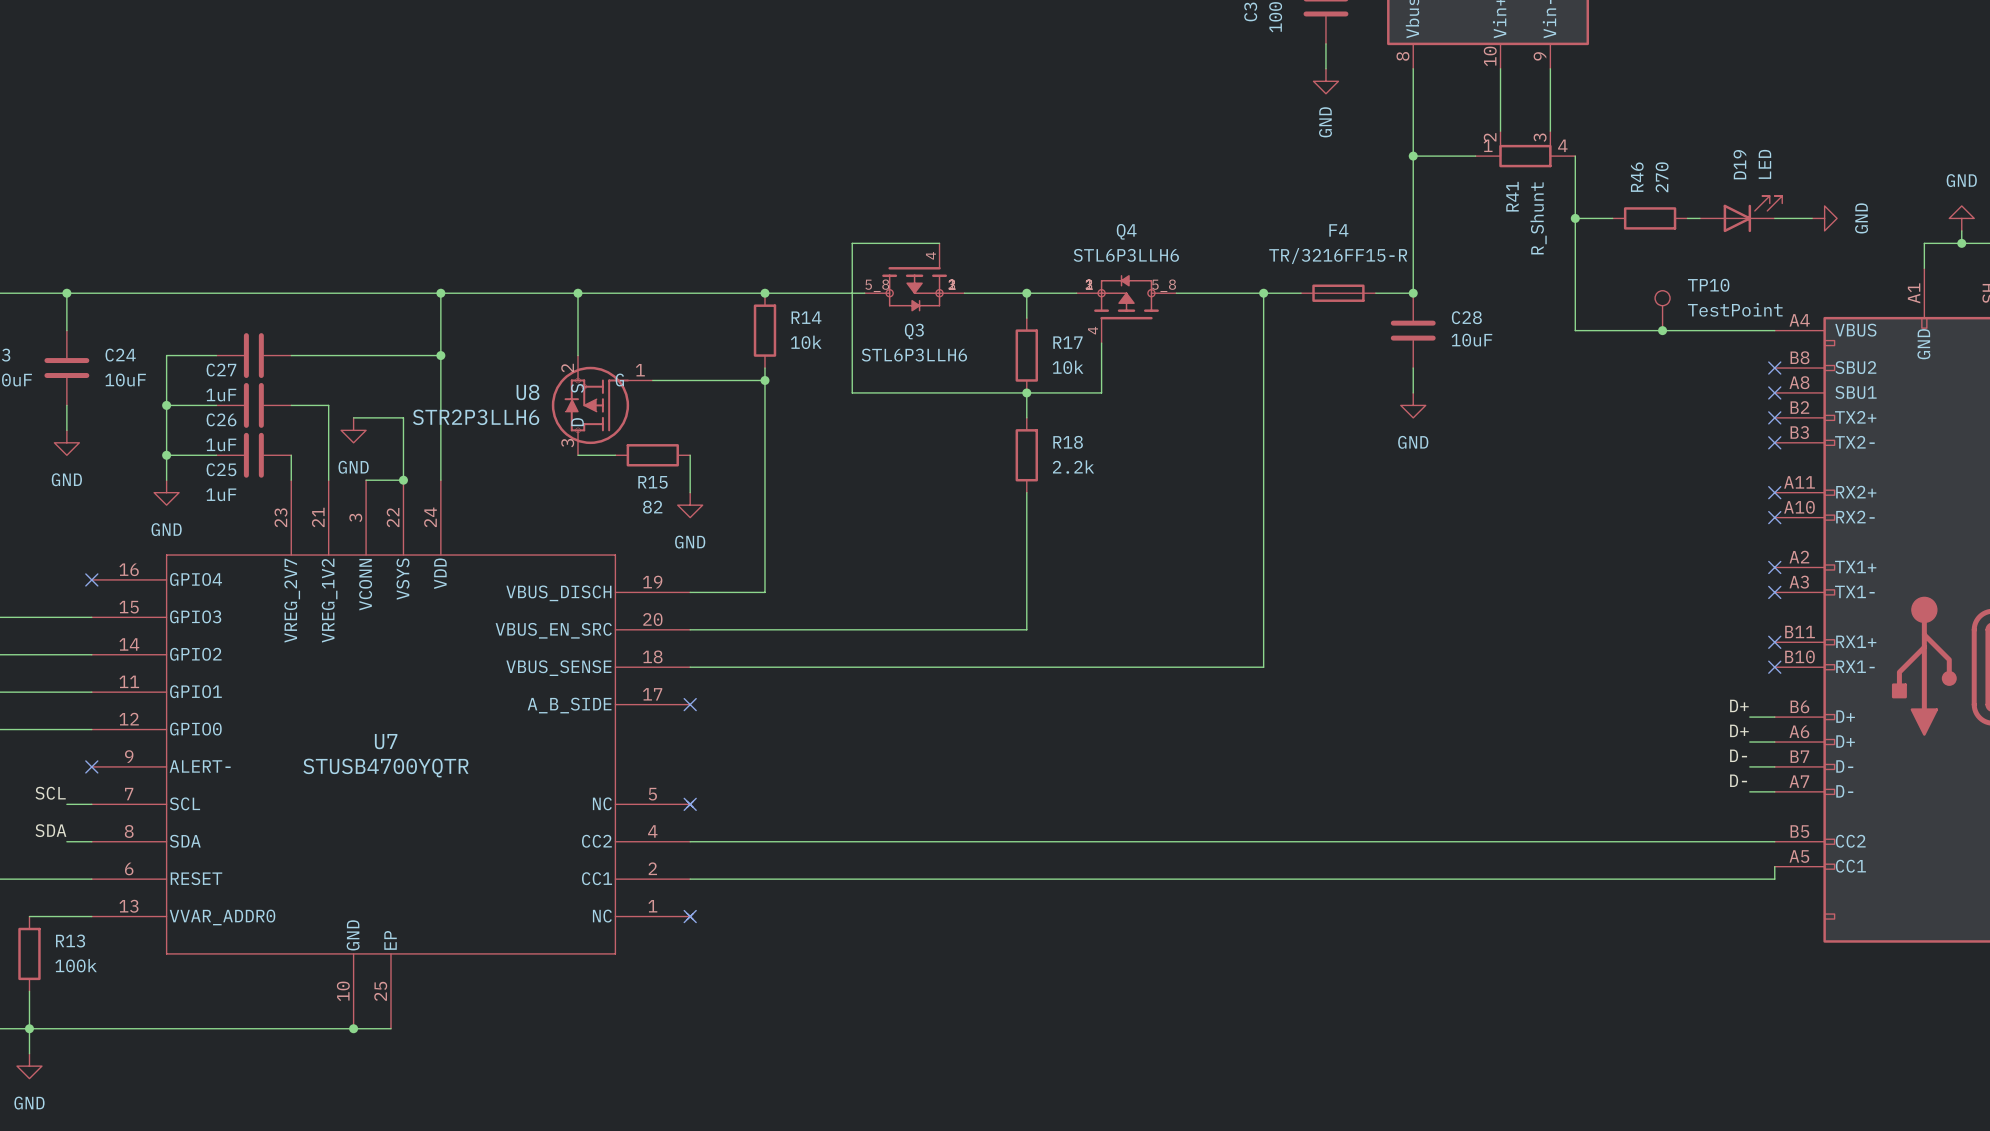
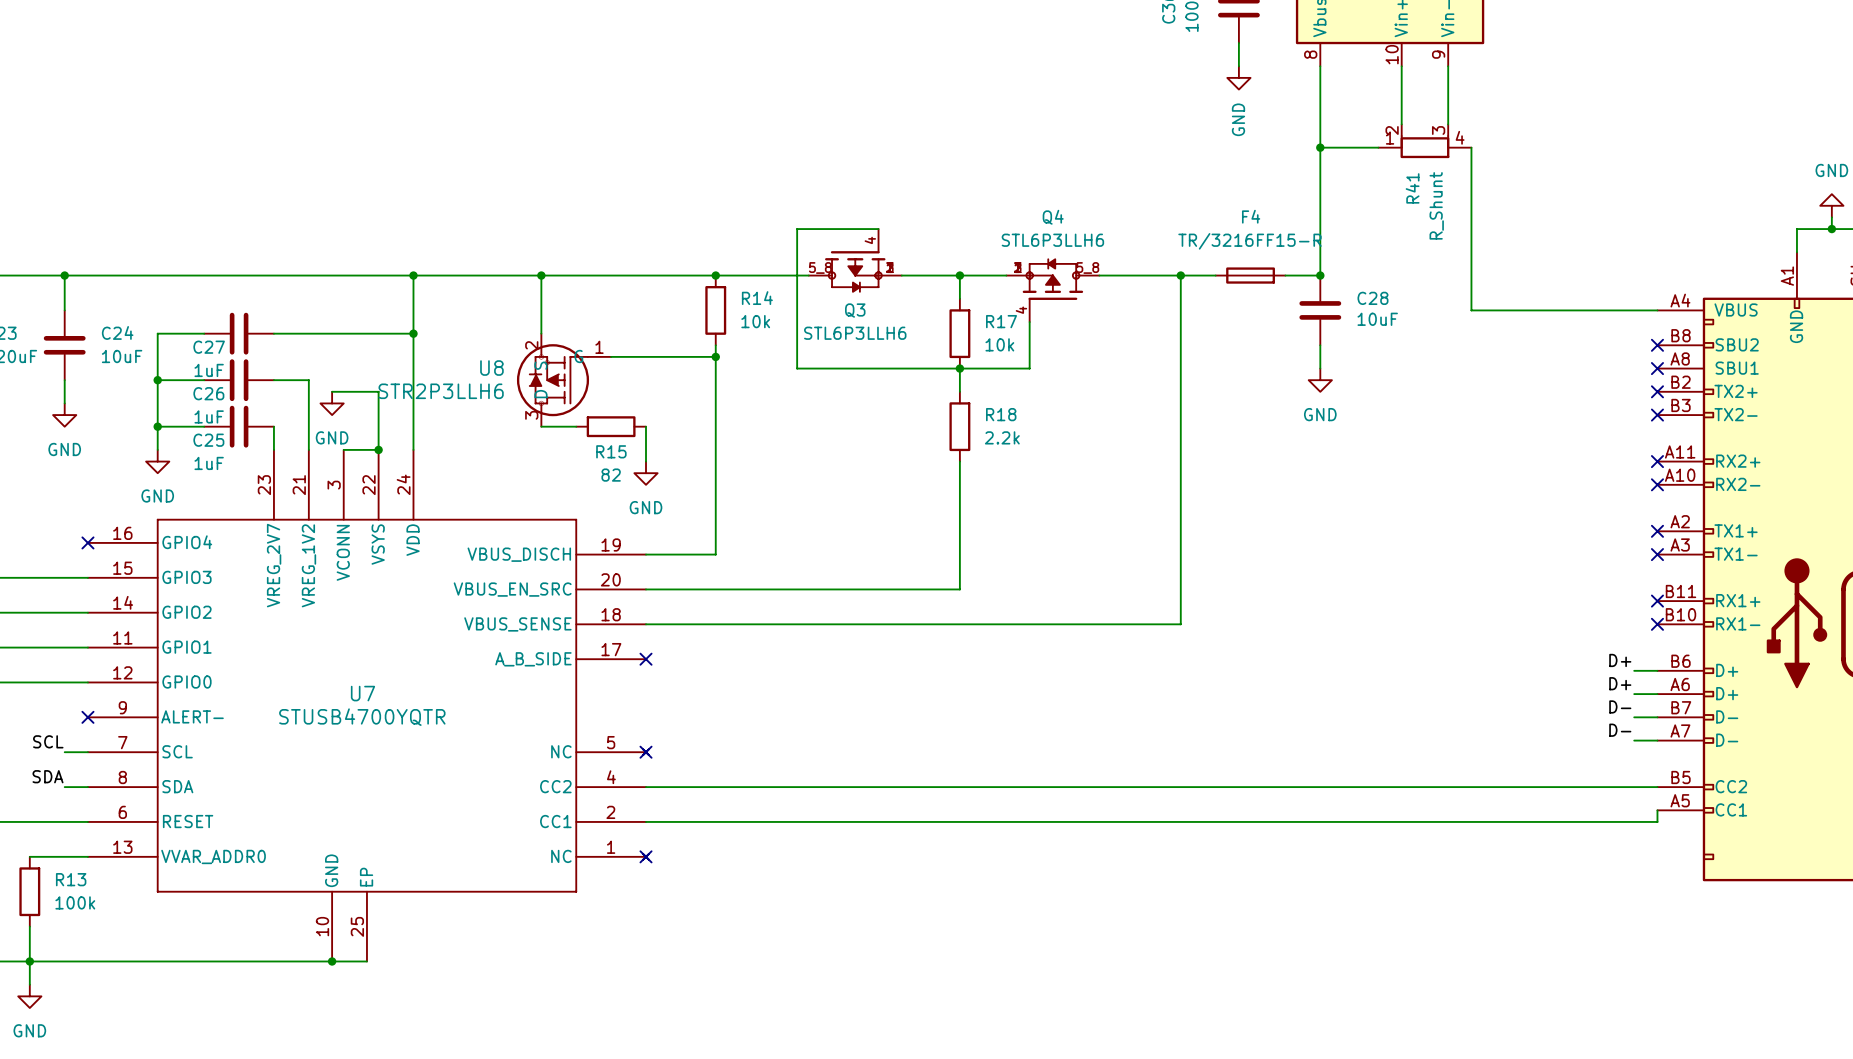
D19: LED (1741, 214) -> none
wire: (1575, 218) (1612, 218) -> none
junction: (1575, 218) -> none
R46: 270 (1650, 218) -> none
wire: (1687, 218) (1699, 218) -> none
wire: (1774, 218) (1812, 218) -> none
power symbol: GND (1824, 218) -> none
TP10: TestPoint (1662, 310) -> none
junction: (1662, 330) -> none

